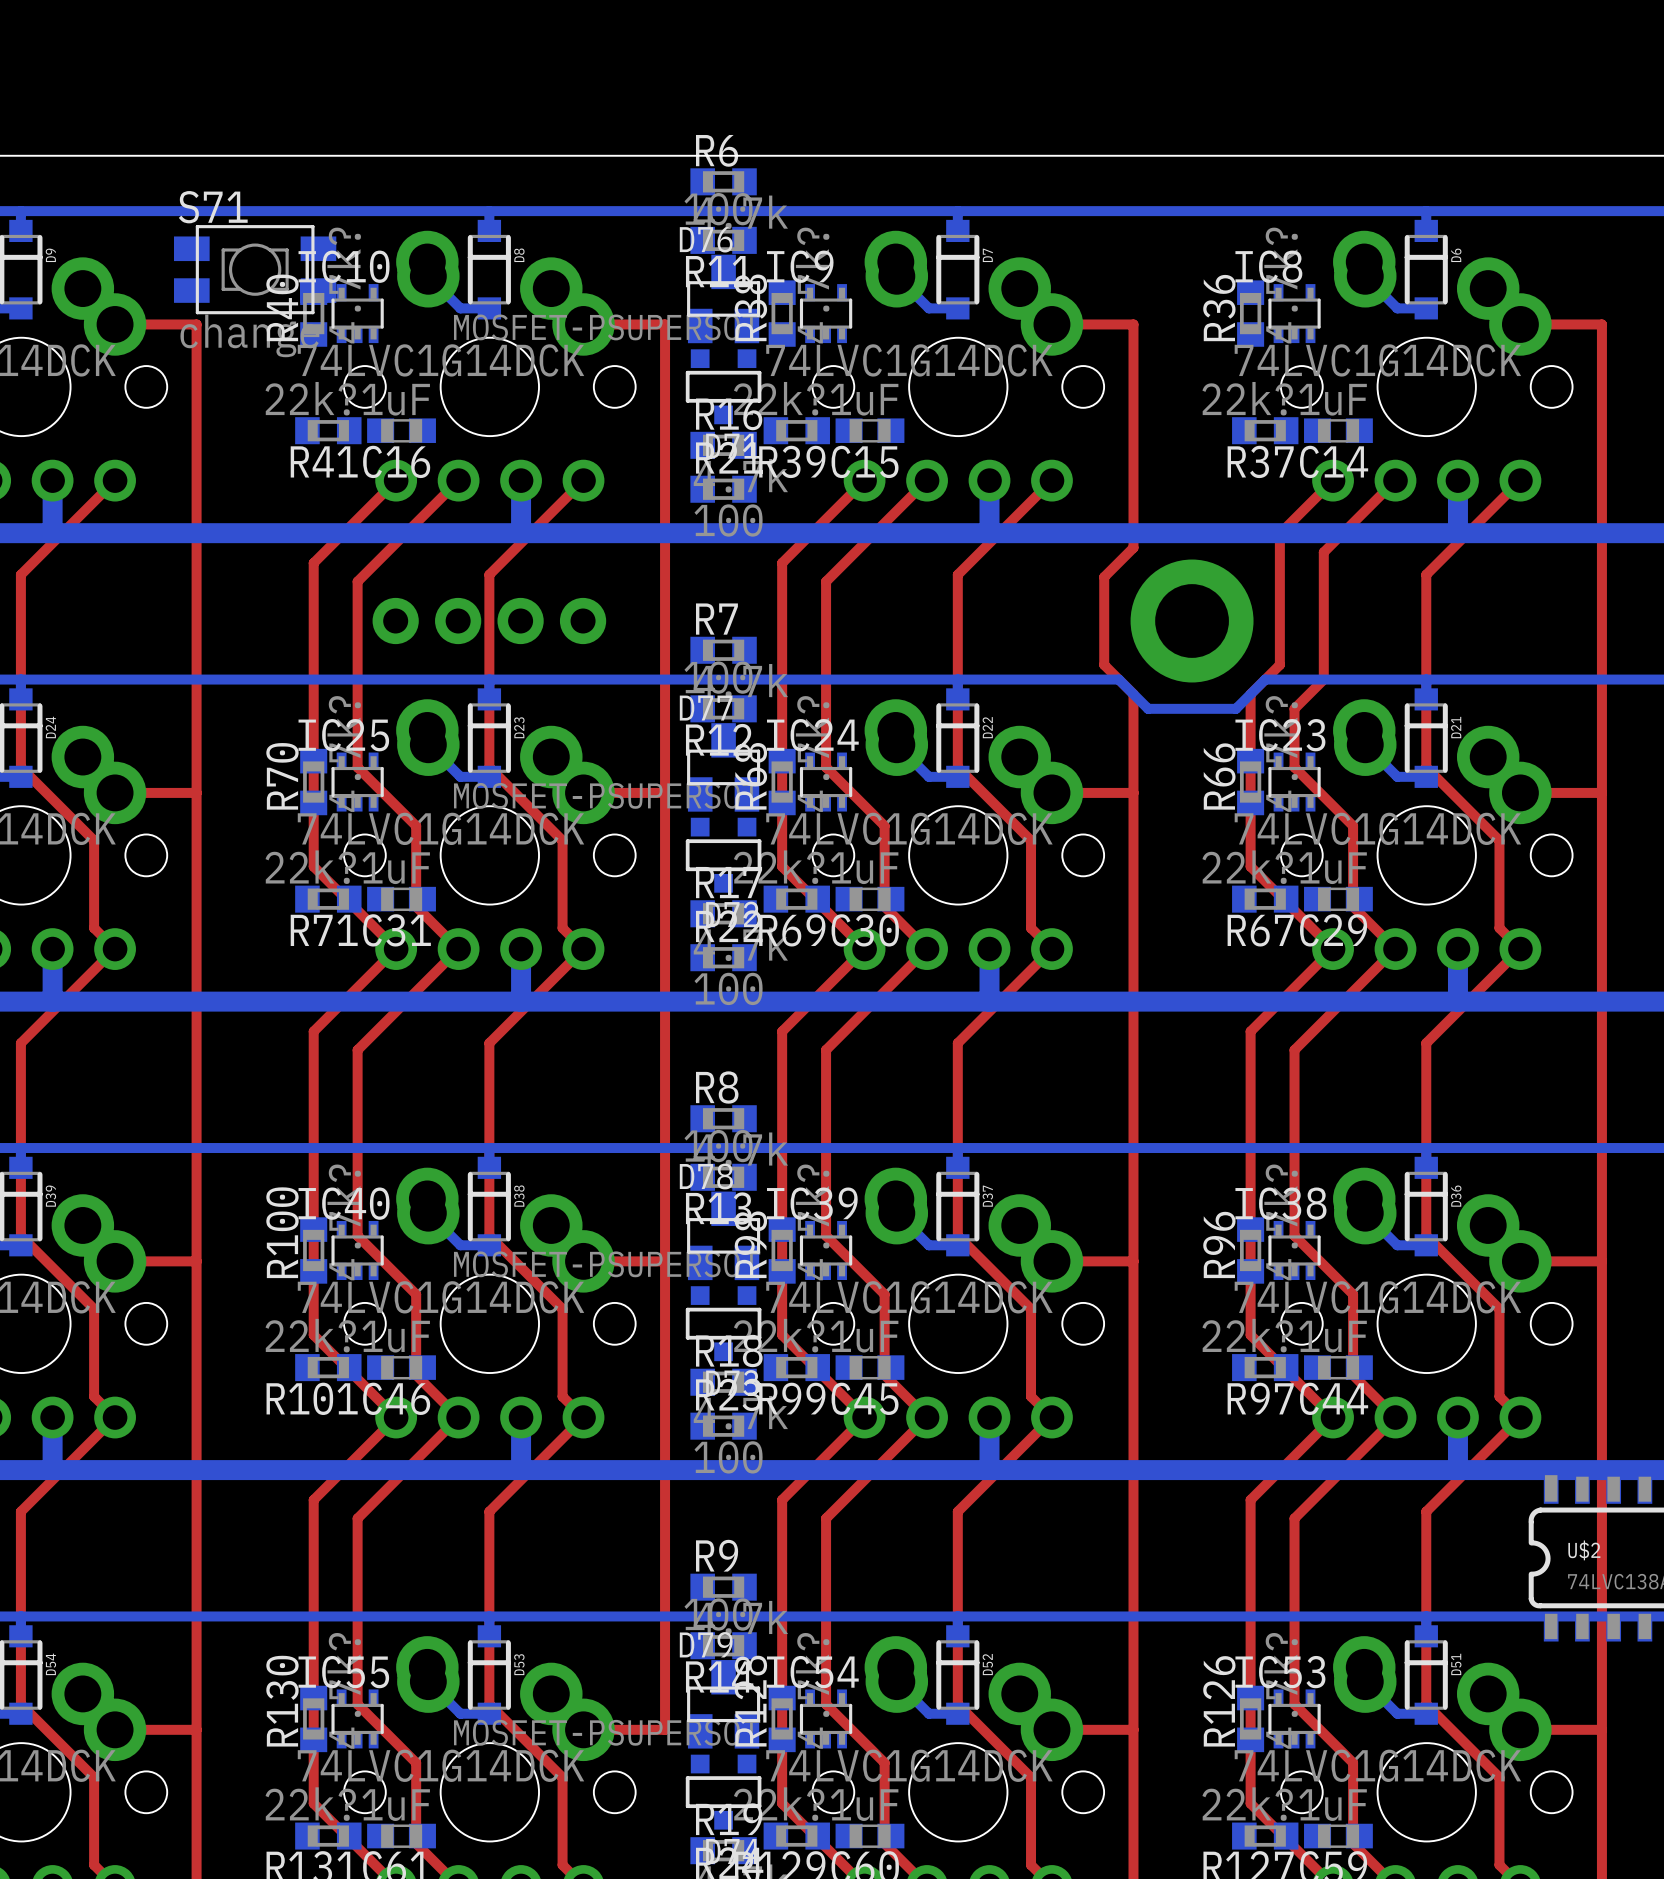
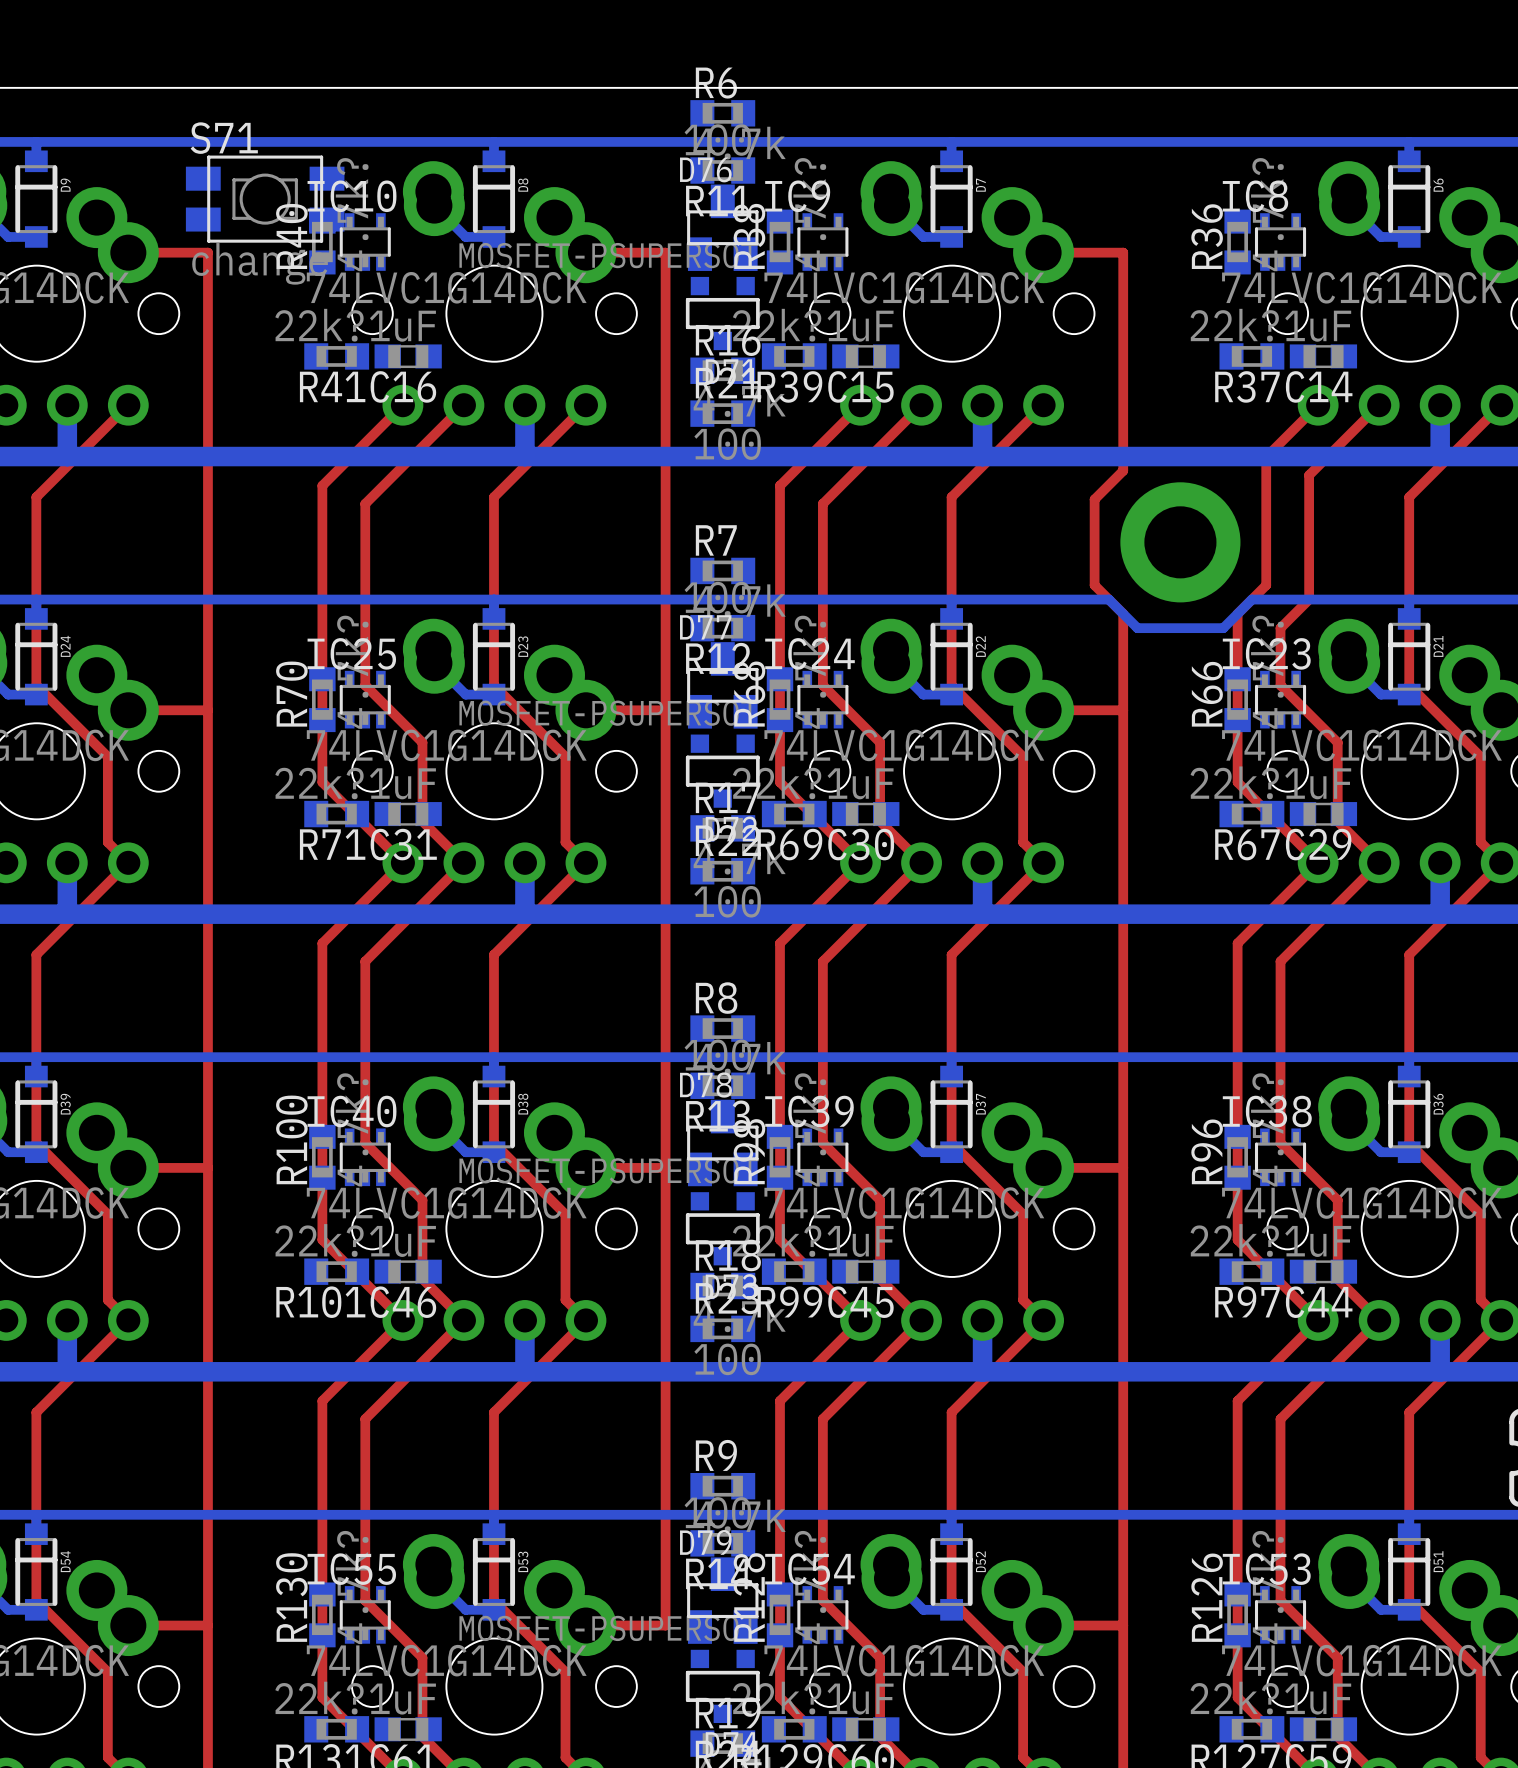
part: (489, 621) -> none

